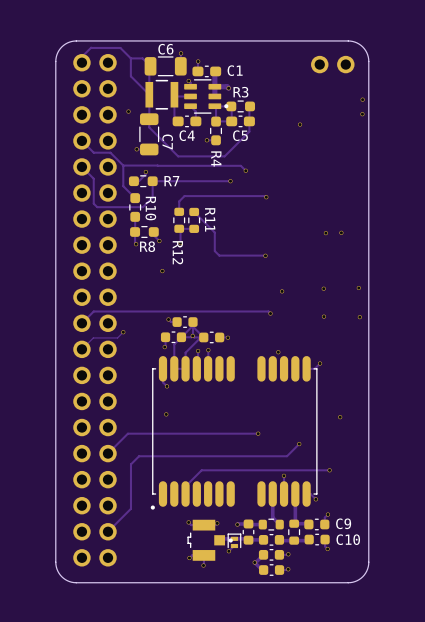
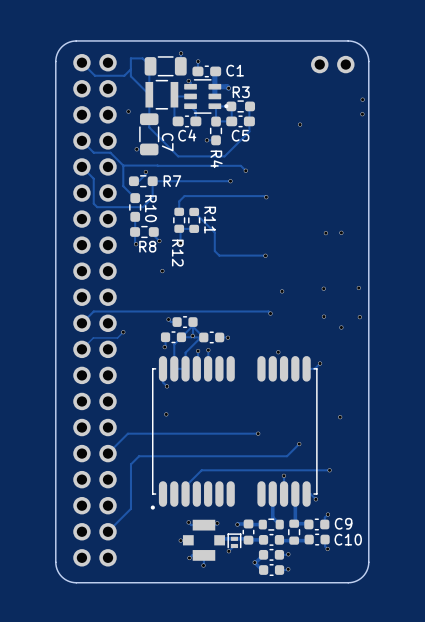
C6 name: C6 (165, 49) -> none
track: (81, 56) (91, 47) (120, 47) (130, 58) -> none
track: none -> (81, 62) (94, 75) (124, 75) (130, 69)
via: none -> (341, 327)
part footprint: [187, 519, 233, 561] -> [182, 519, 226, 561]
via: none -> (180, 540)

